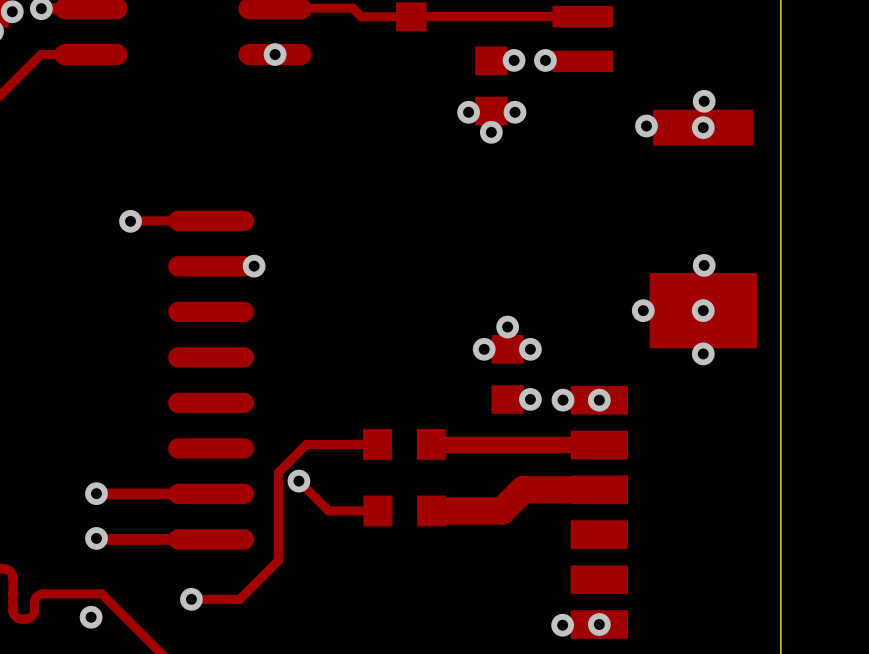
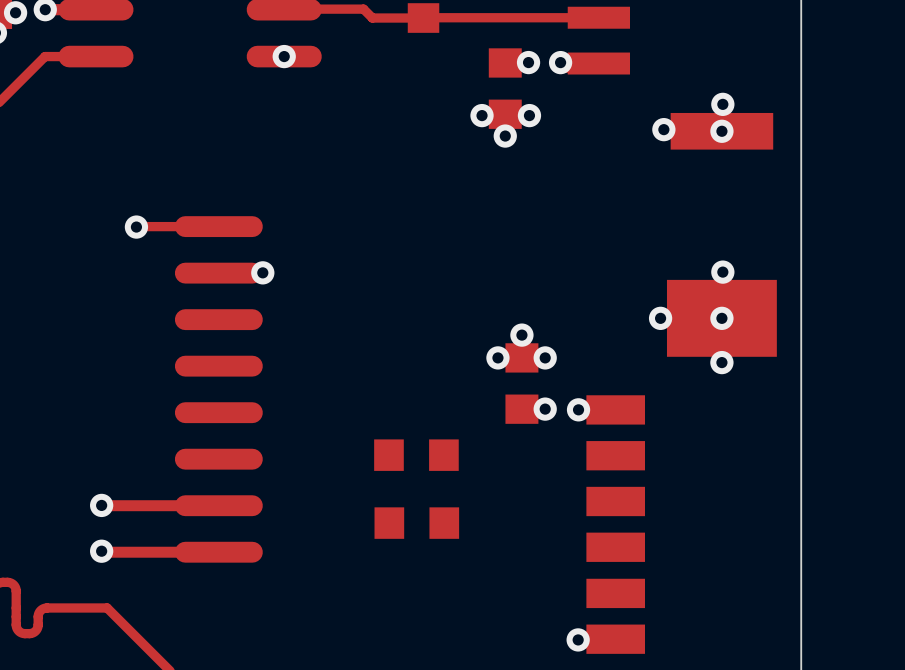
via: (599, 400) -> none
top track: (377, 444) (306, 444) (278, 472) (278, 560) (239, 599) (191, 599) -> none
top track: (431, 444) (599, 445) -> none
top track: (298, 481) (328, 510) (377, 510) -> none
via: (298, 481) -> none
top track: (599, 489) (523, 489) (502, 510) (431, 510) -> none
via: (191, 599) -> none
via: (91, 617) -> none
via: (599, 624) -> none

